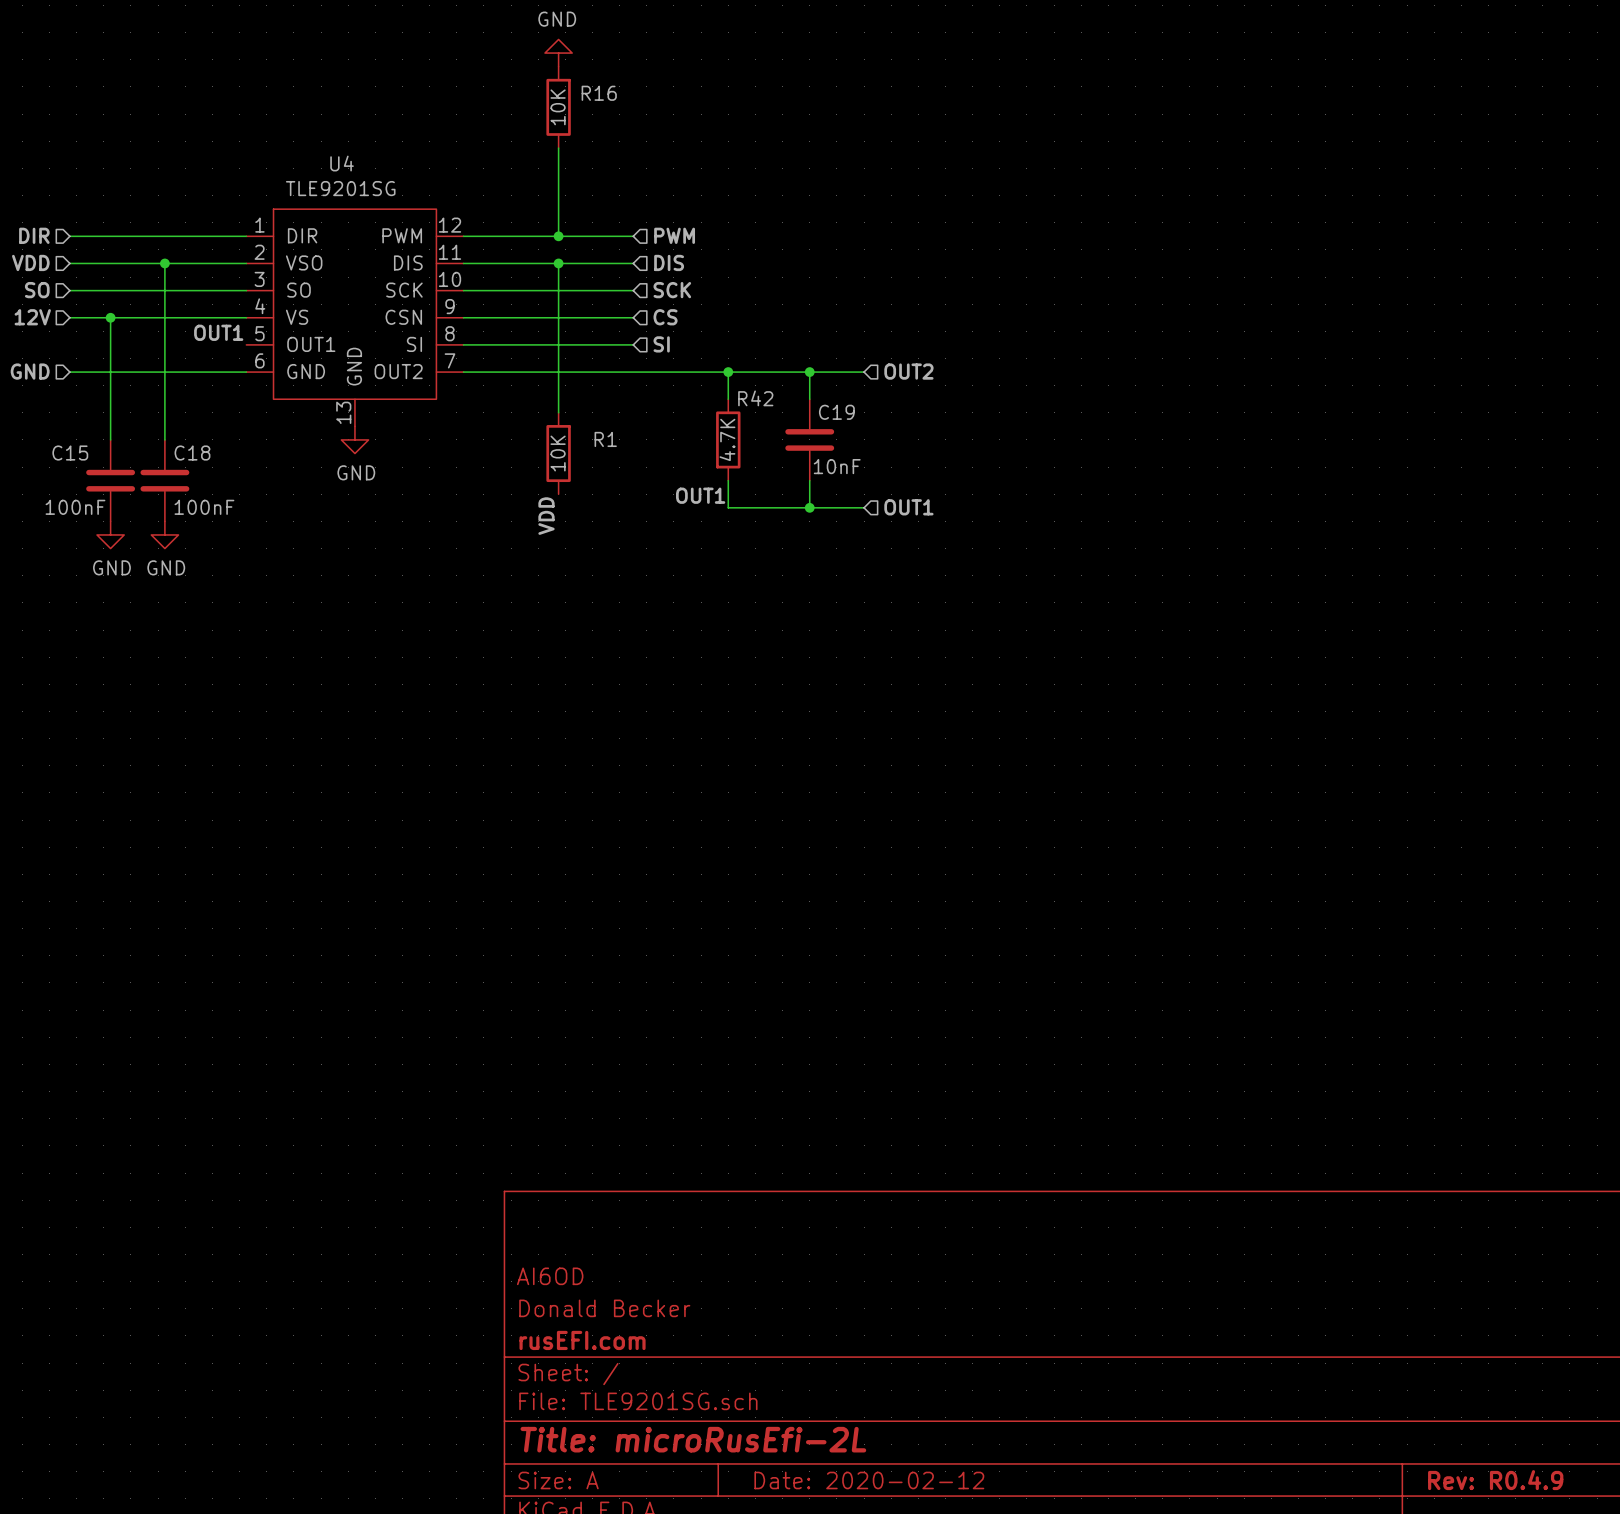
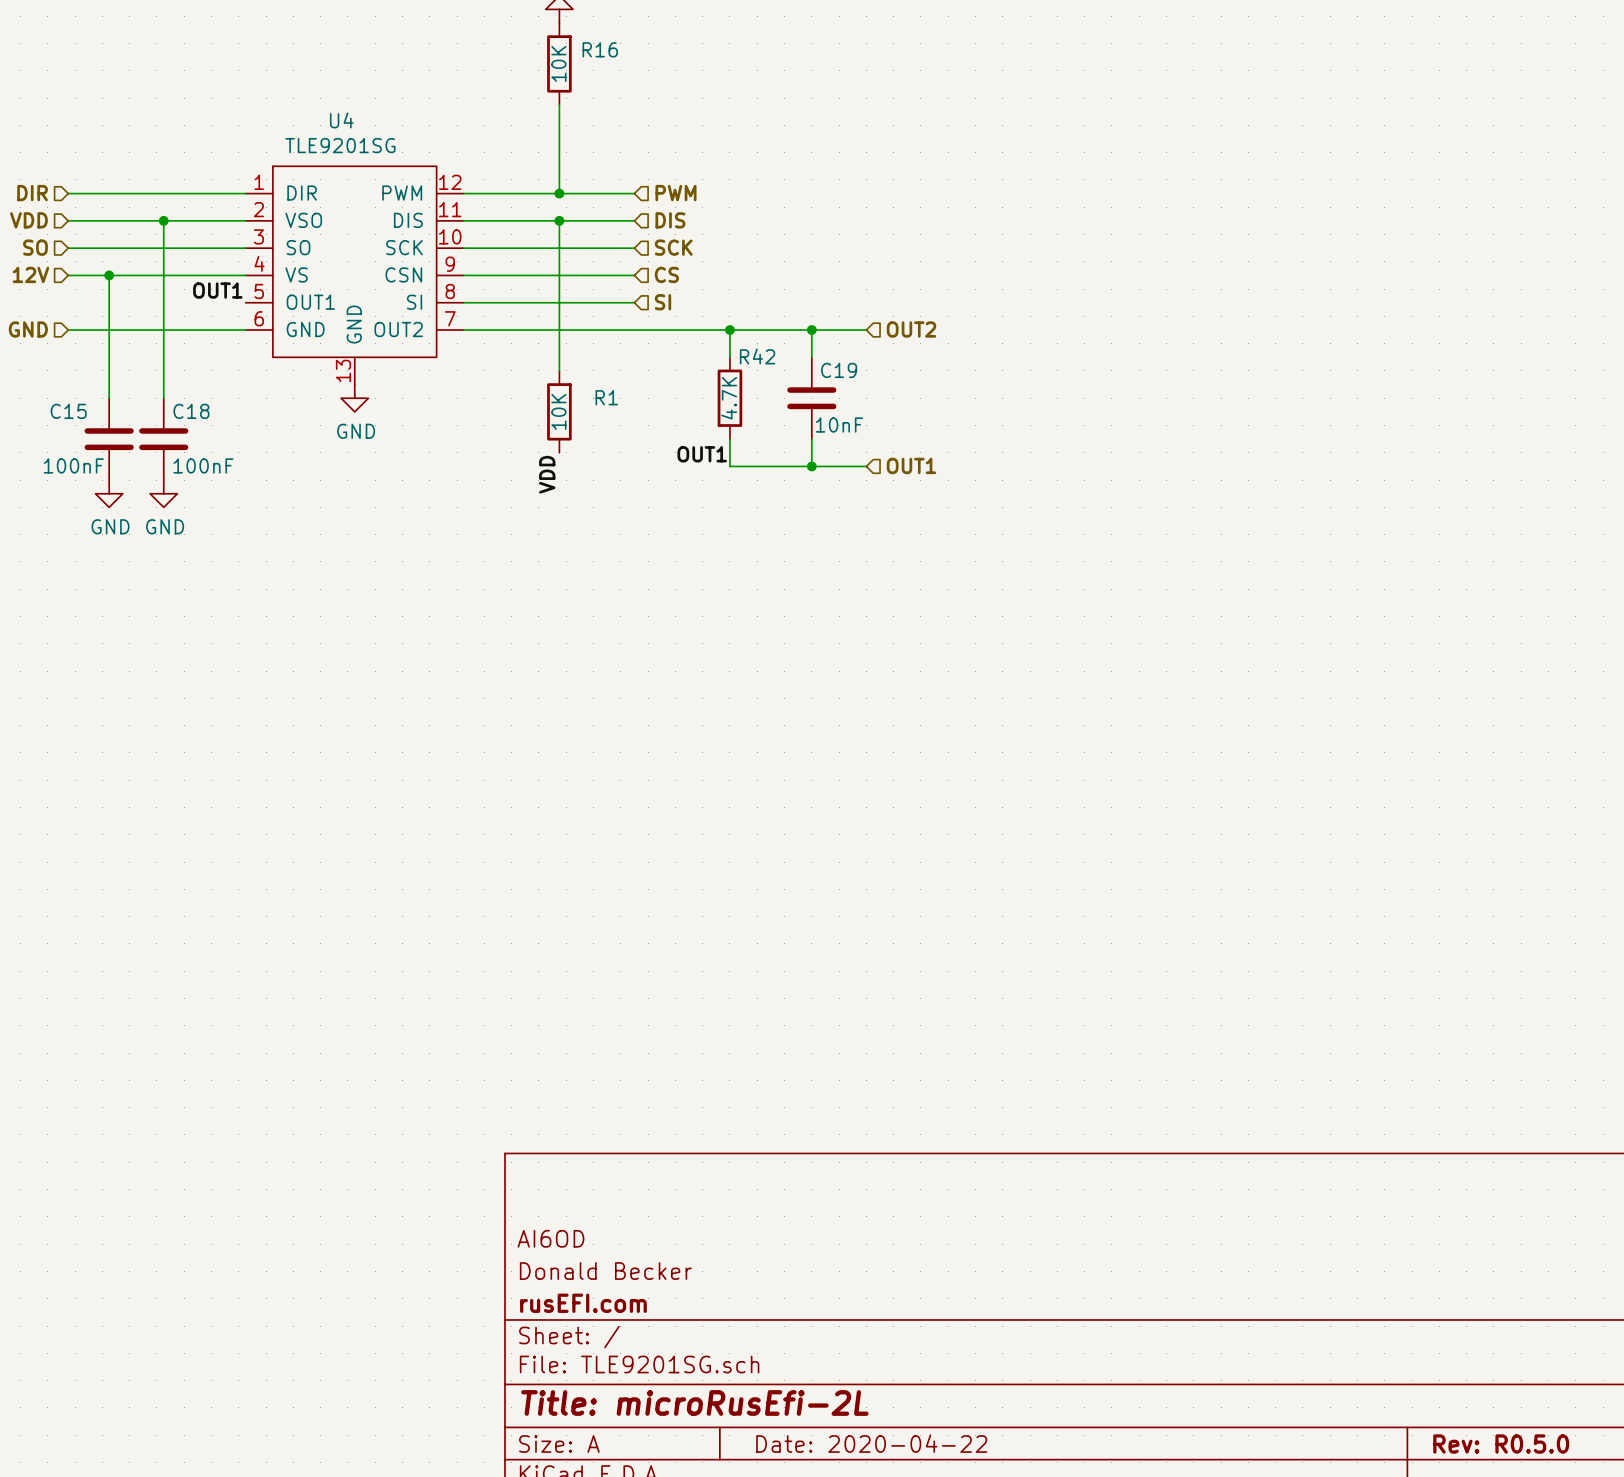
title block: Date: 2020-02-12 (869, 1480) -> Date: 2020-04-22 (871, 1443)
title block: Rev: R0.4.9 (1495, 1480) -> Rev: R0.5.0 (1501, 1444)

